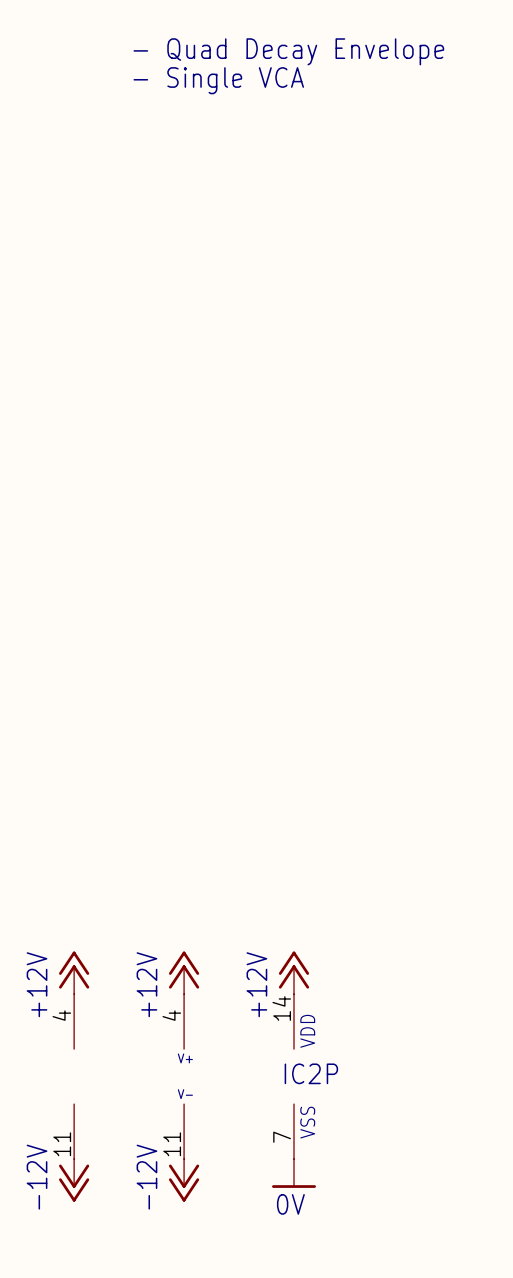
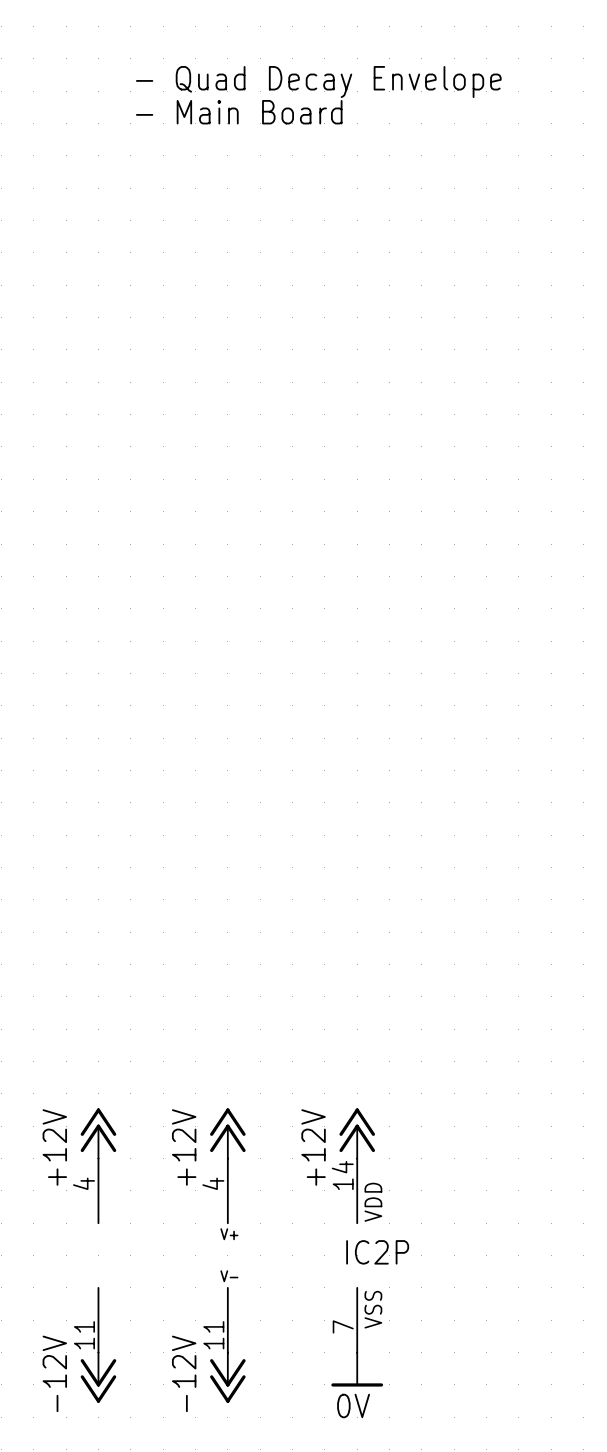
text position: - Quad Decay Envelope (288, 51) -> - Quad Decay Envelope (318, 82)
text: - Single VCA (218, 80) -> none
text: none -> - Main Board (239, 112)

